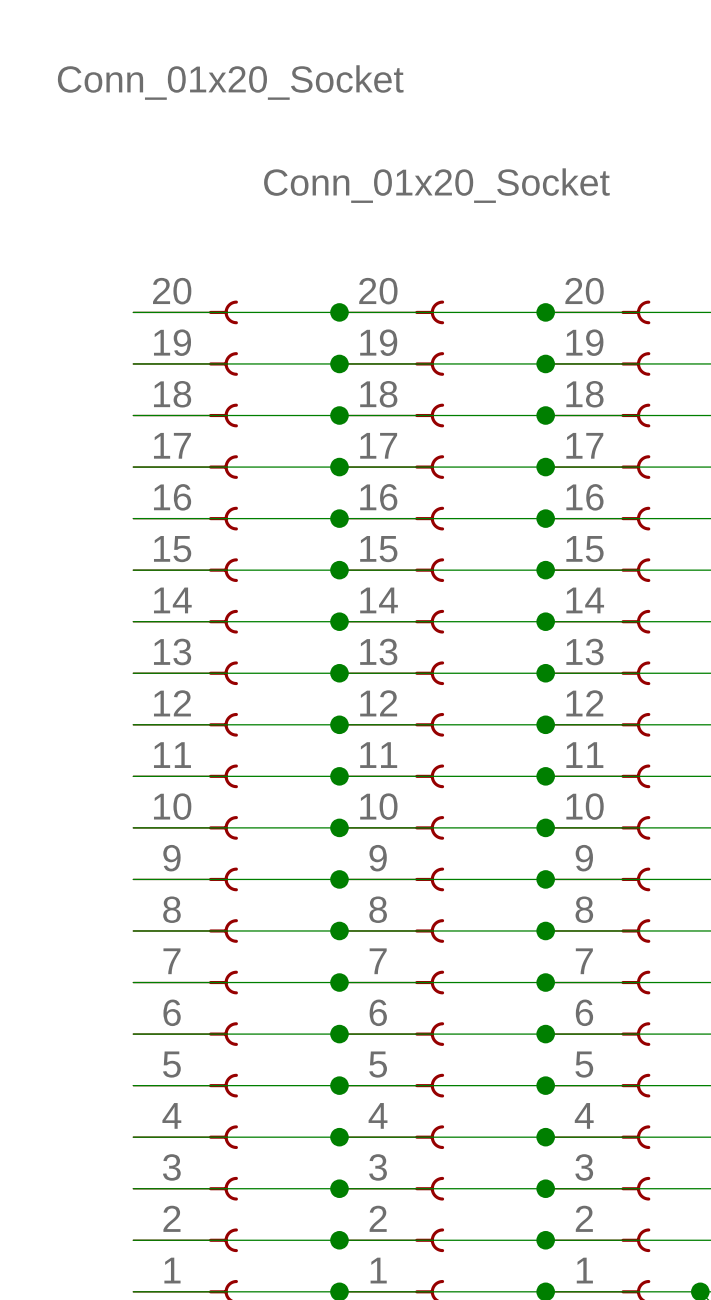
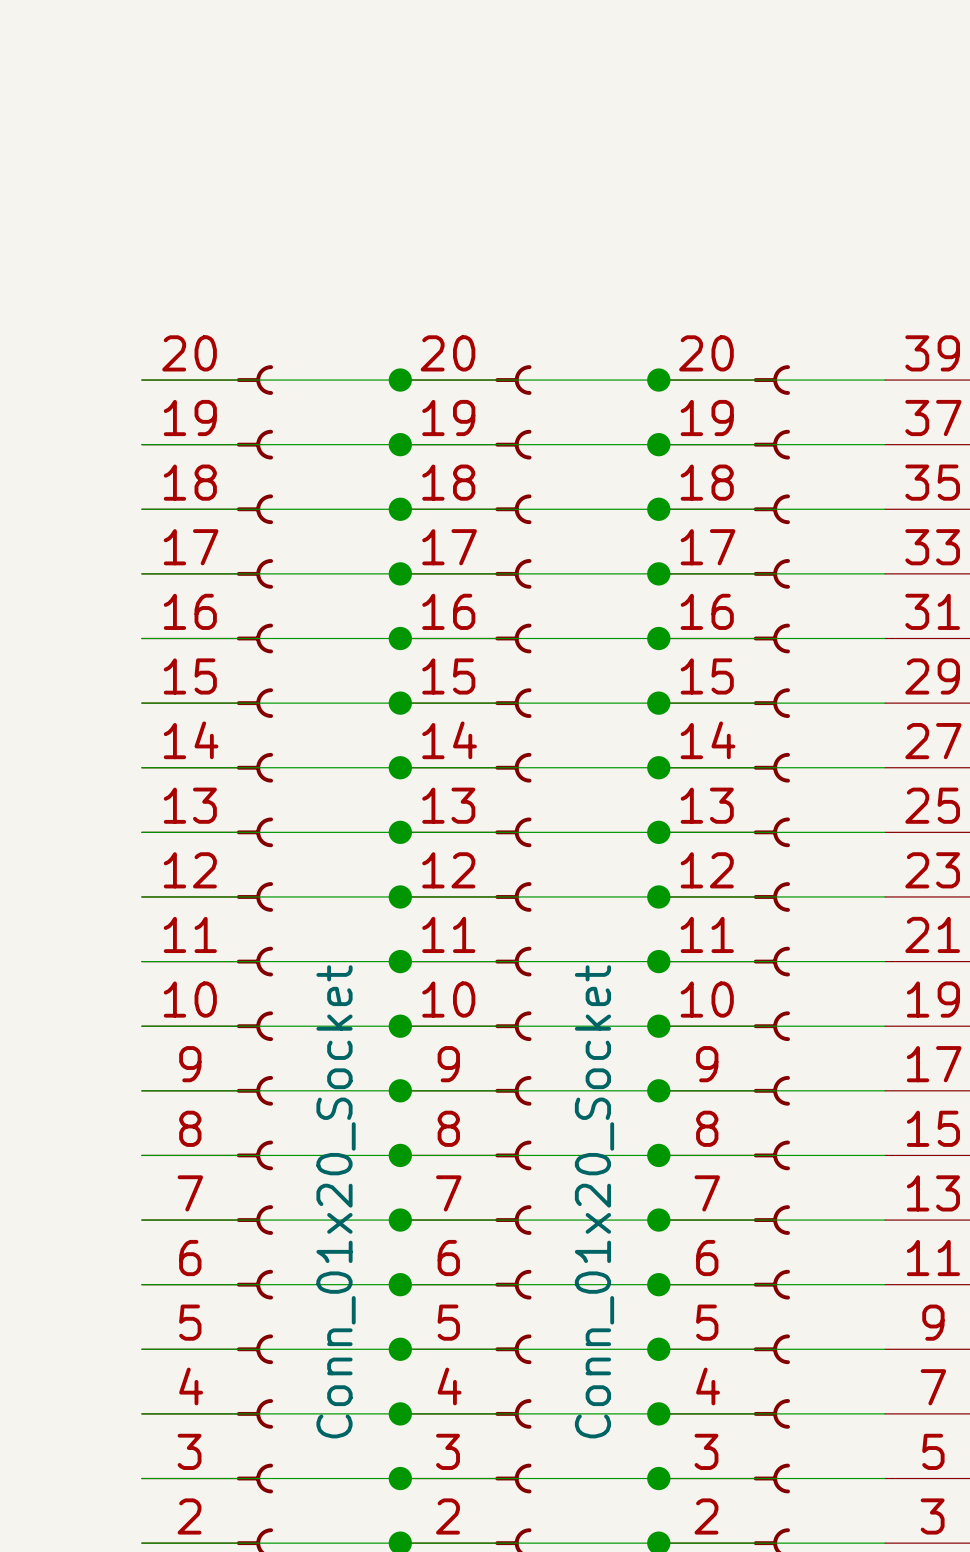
part value rotation: 0° (230, 82) -> 90° counterclockwise (336, 1201)
part value position: Conn_01x20_Socket (230, 82) -> Conn_01x20_Socket (336, 1201)
part value rotation: 0° (436, 185) -> 90° counterclockwise (594, 1201)
part value position: Conn_01x20_Socket (436, 185) -> Conn_01x20_Socket (594, 1201)

